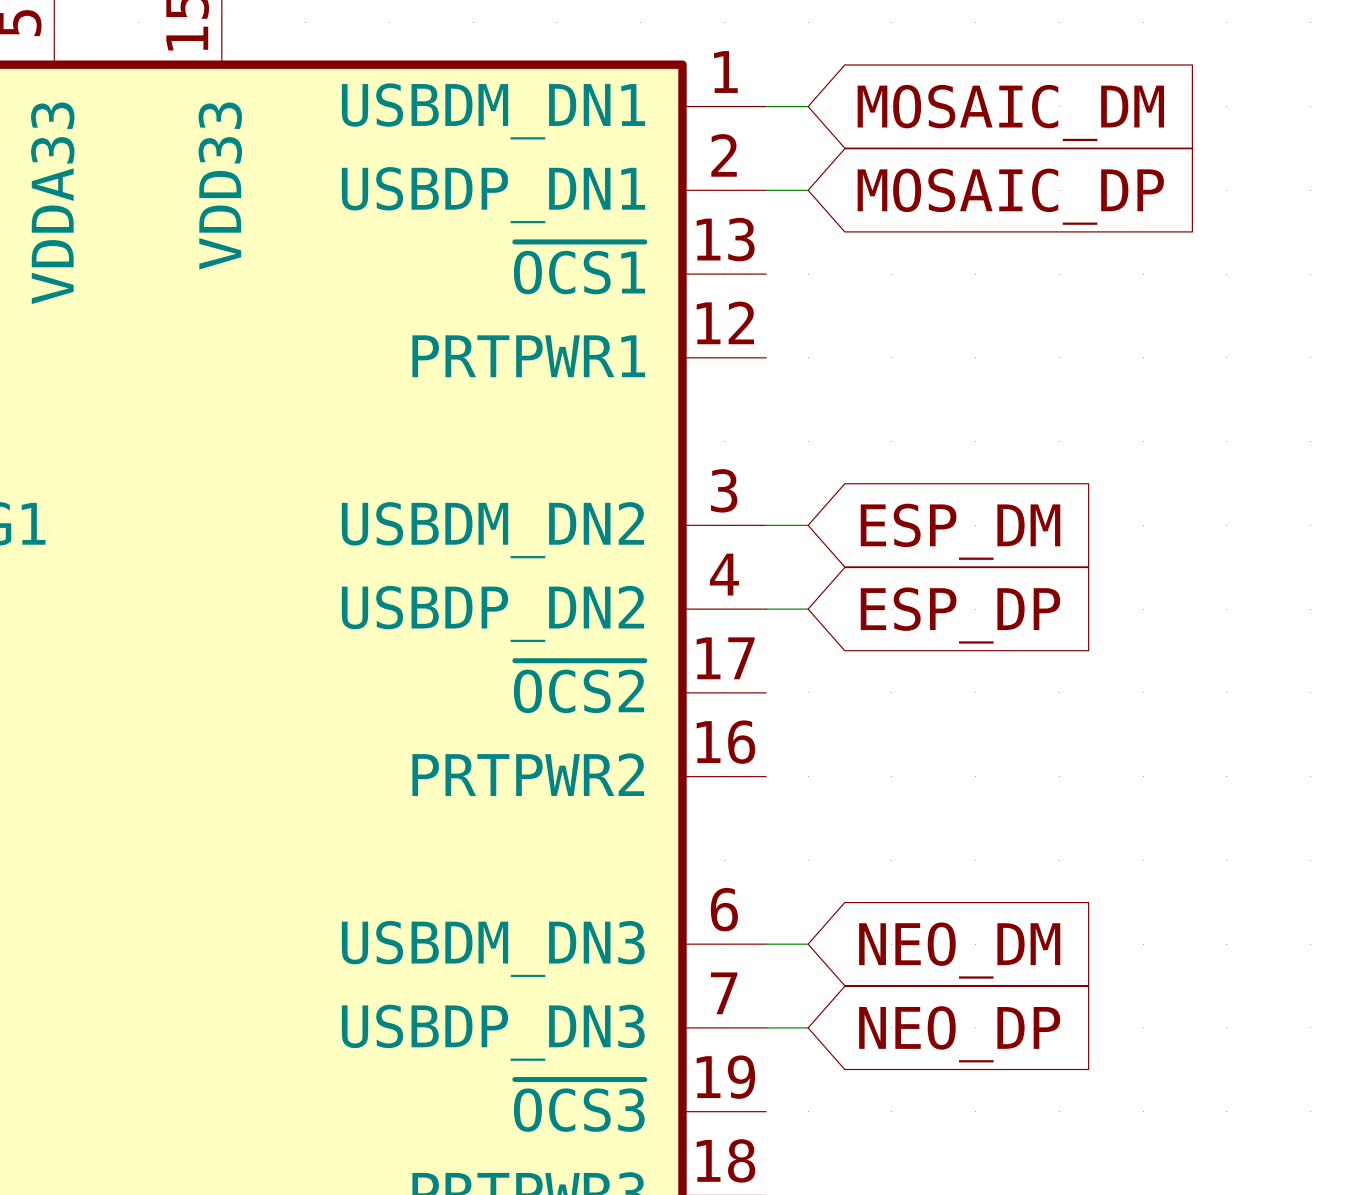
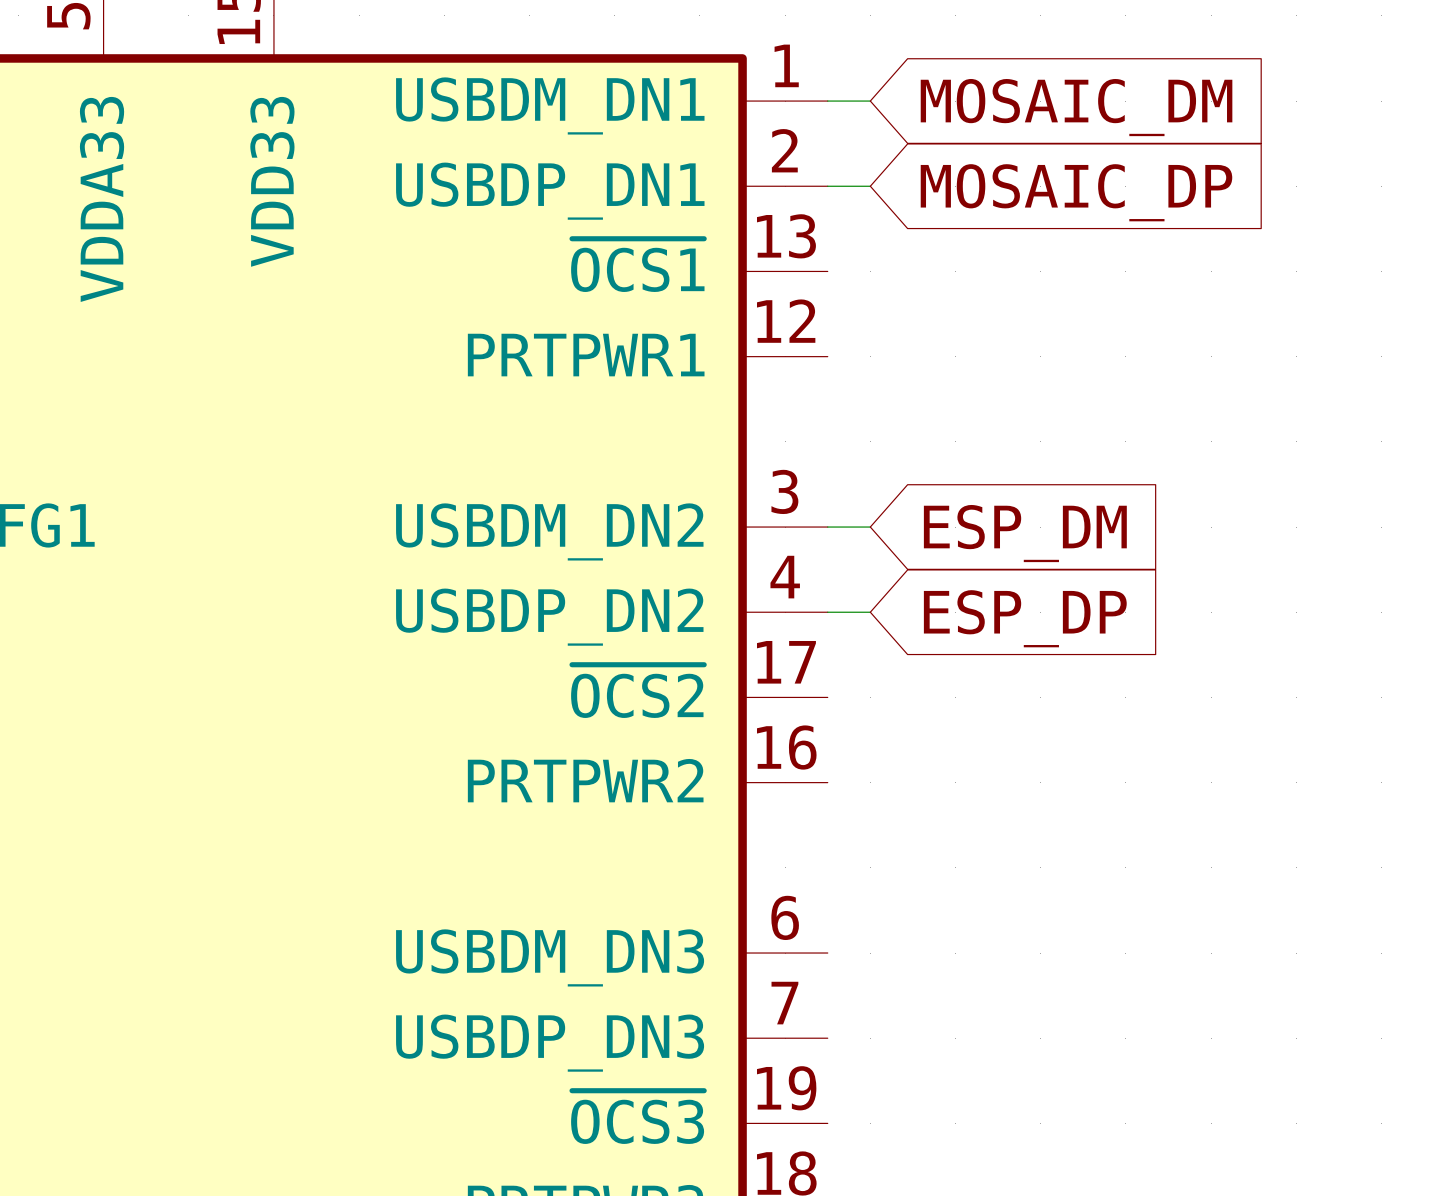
wire: (766, 944) (808, 944) -> none
global label: NEO_DM (959, 950) -> none
wire: (766, 1027) (808, 1027) -> none
global label: NEO_DP (959, 1034) -> none

